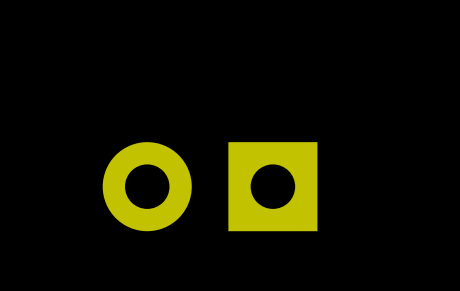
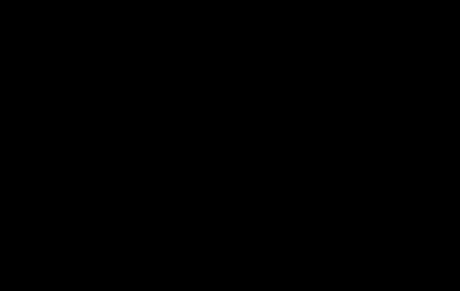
part: (210, 186) -> none

